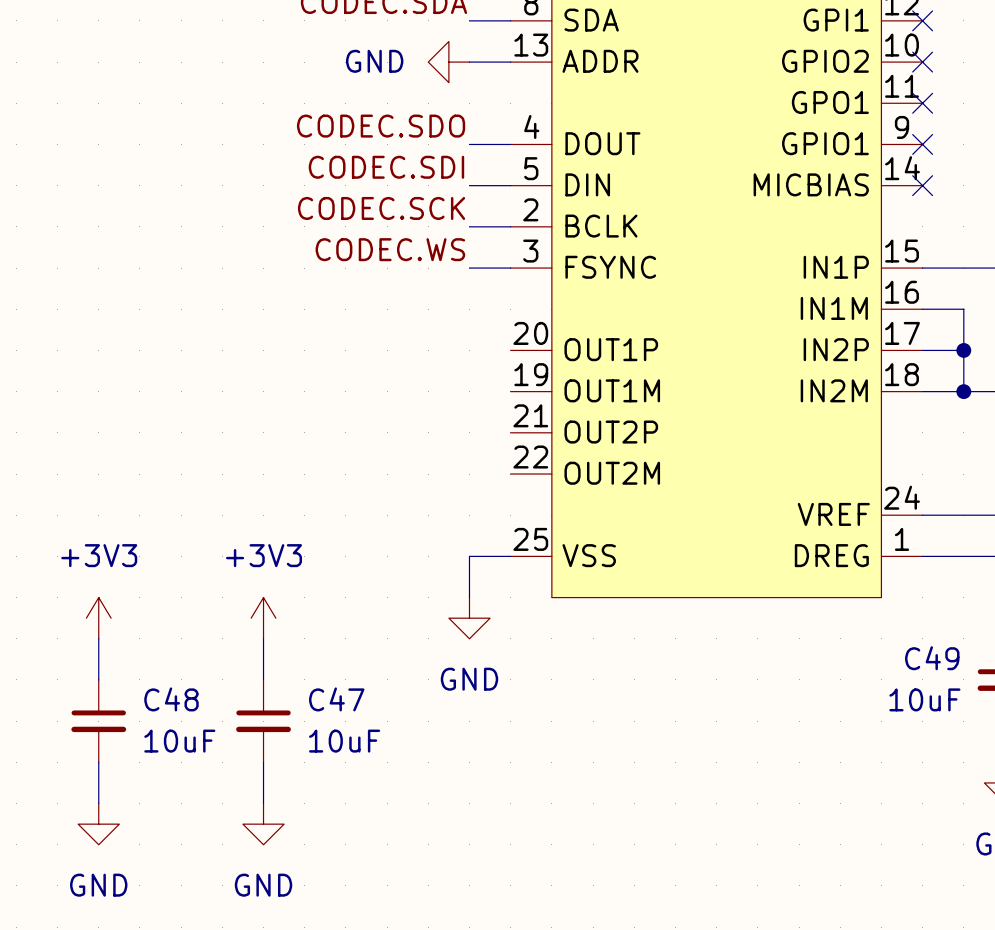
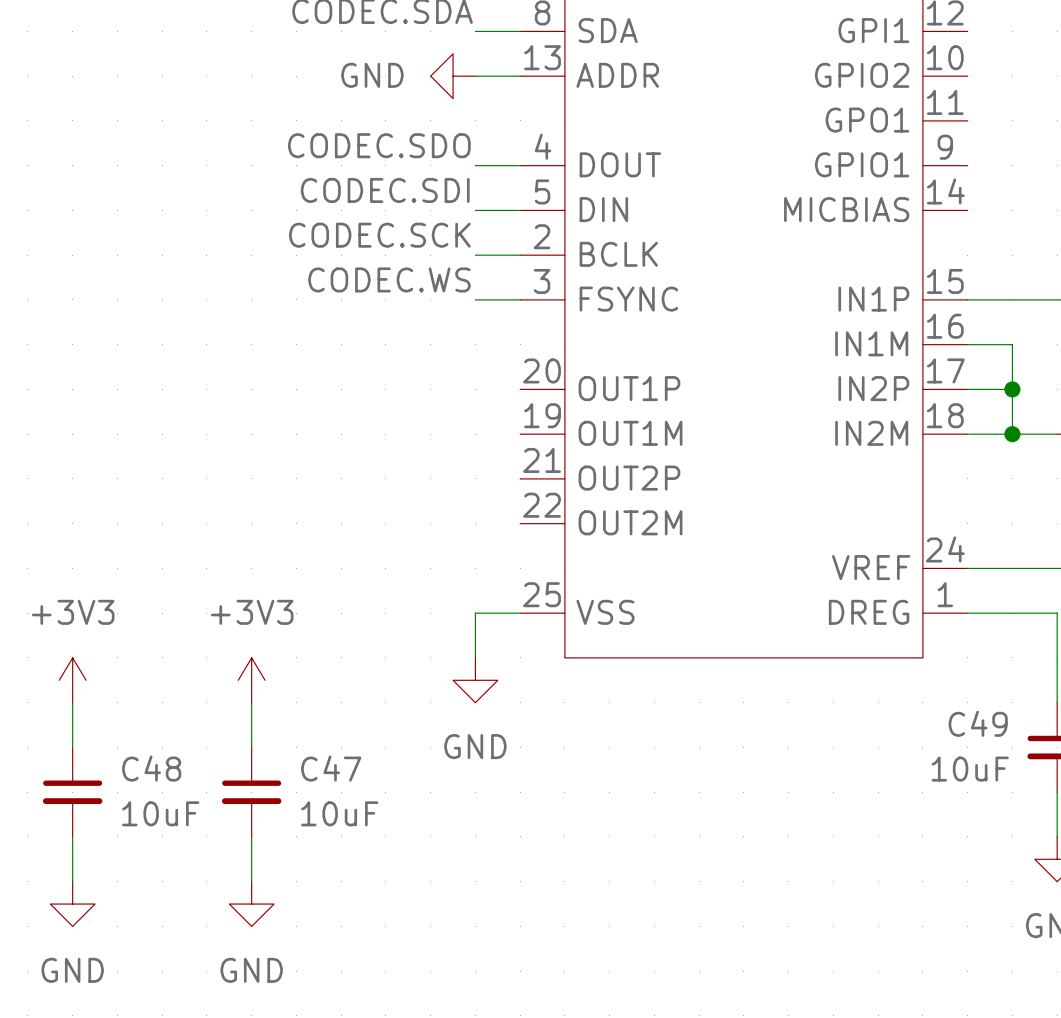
no-connect mark: (922, 20) -> none
no-connect mark: (922, 62) -> none
no-connect mark: (922, 103) -> none
no-connect mark: (922, 144) -> none
no-connect mark: (922, 185) -> none

